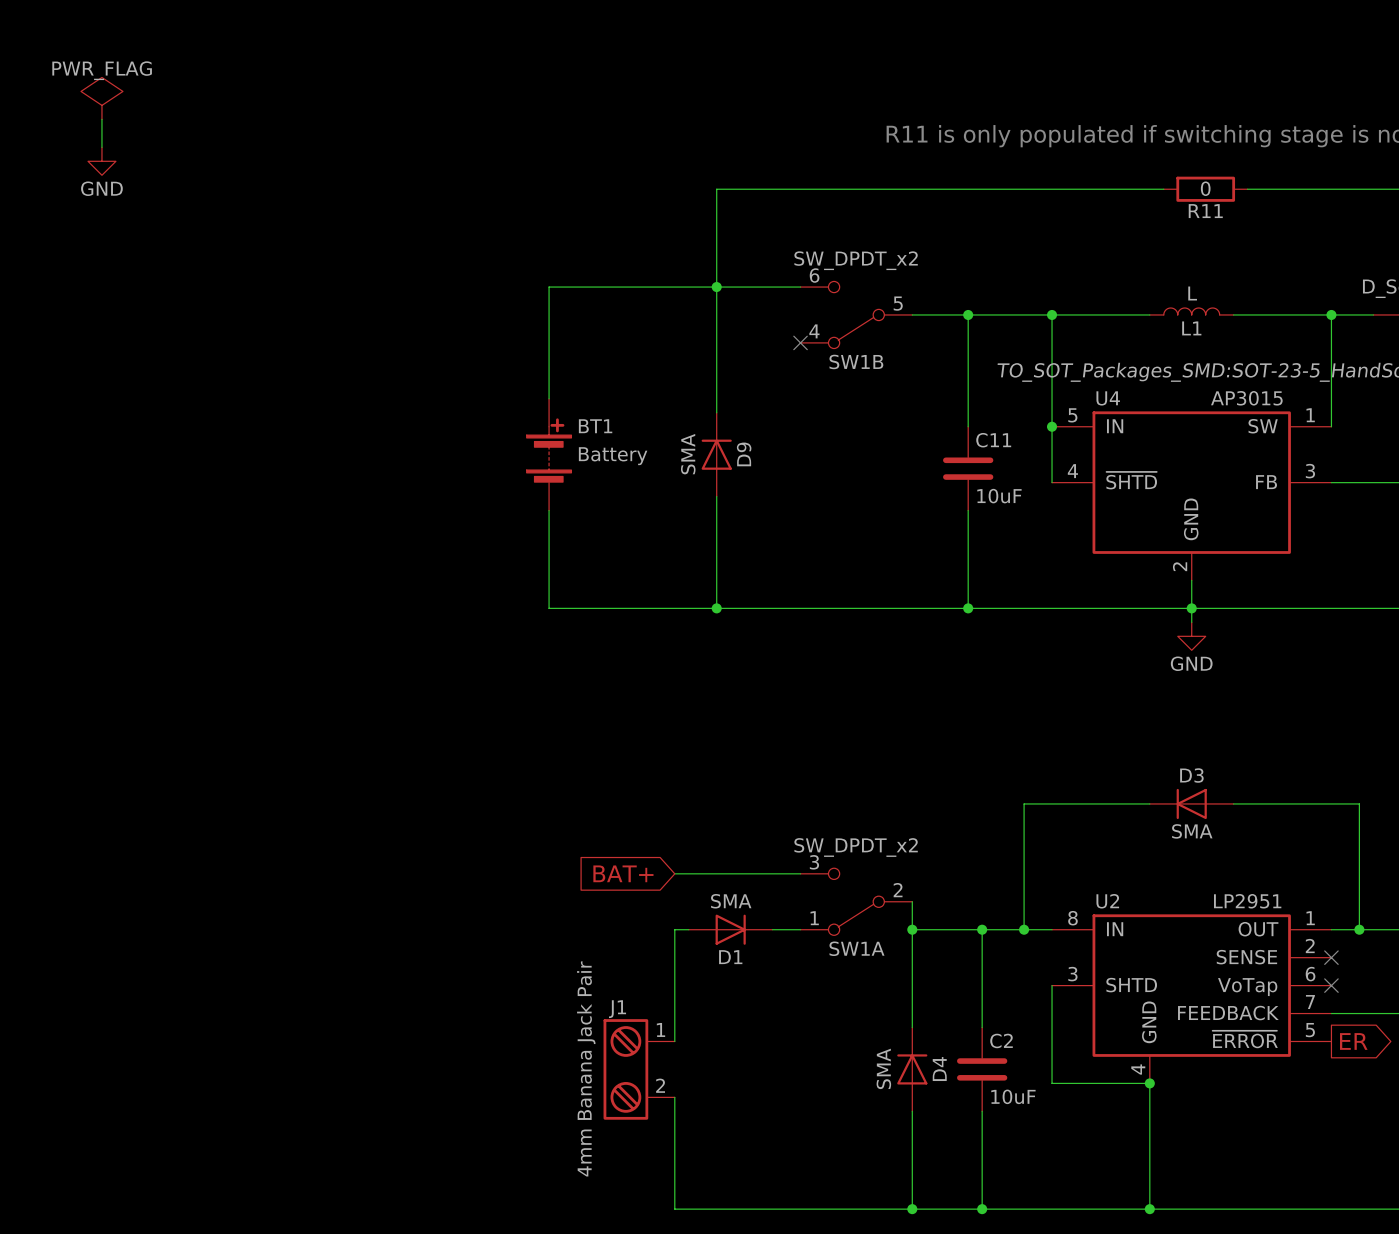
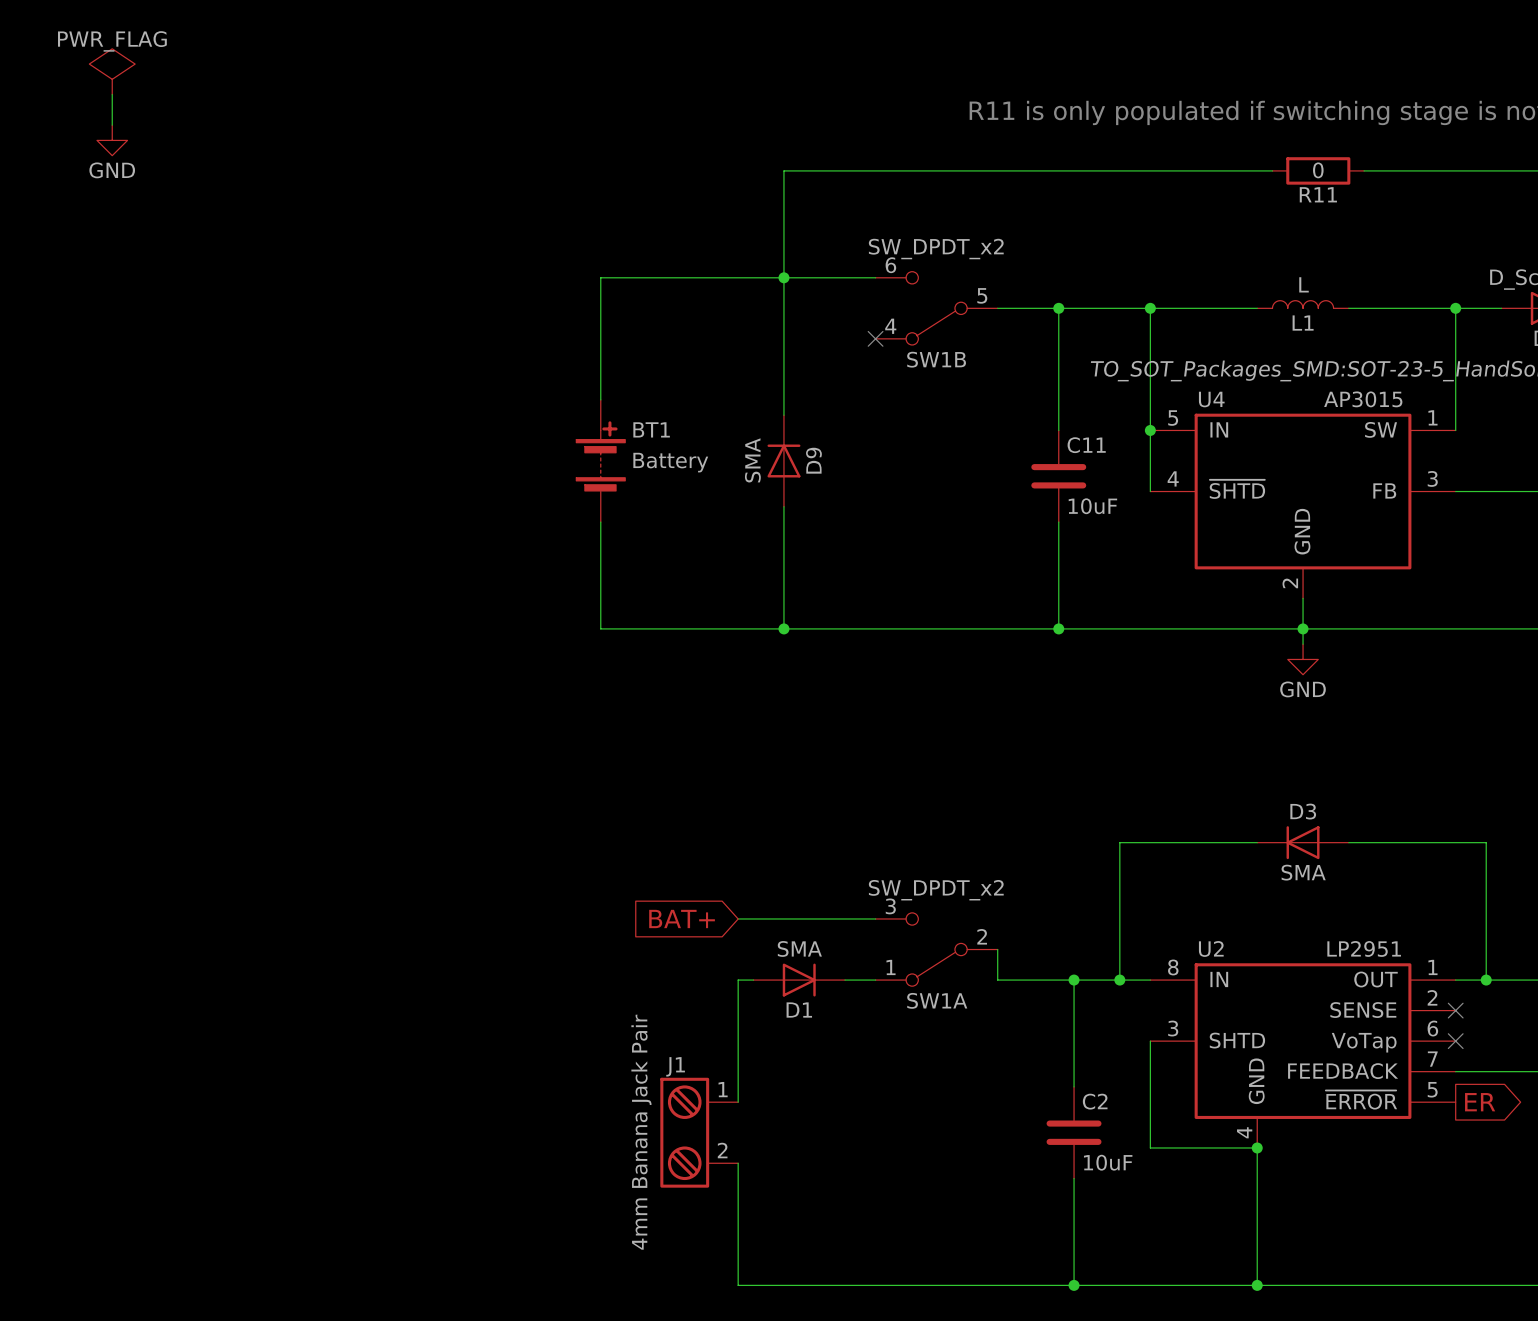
wire: (912, 929) (912, 1027) -> none
junction: (912, 929) -> none
D4: SMA (912, 1069) -> none
wire: (912, 1111) (912, 1209) -> none
junction: (912, 1209) -> none

